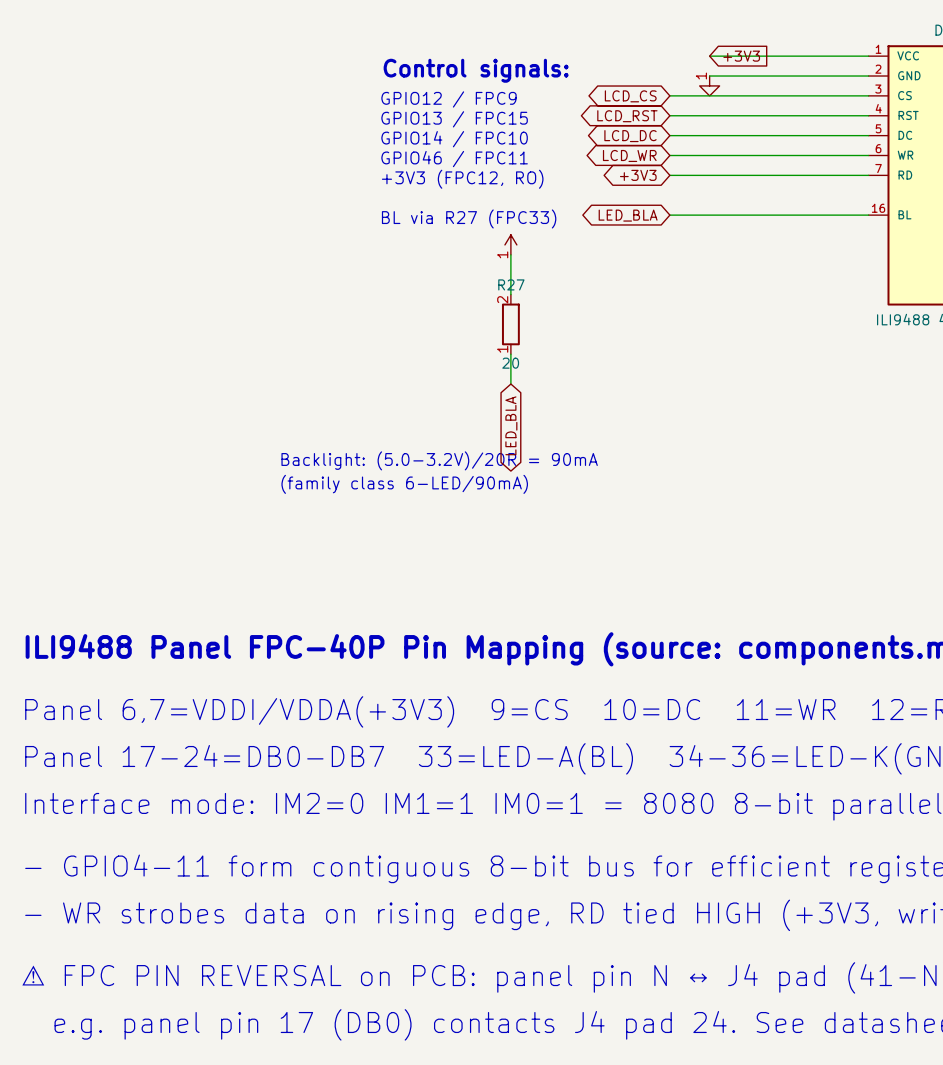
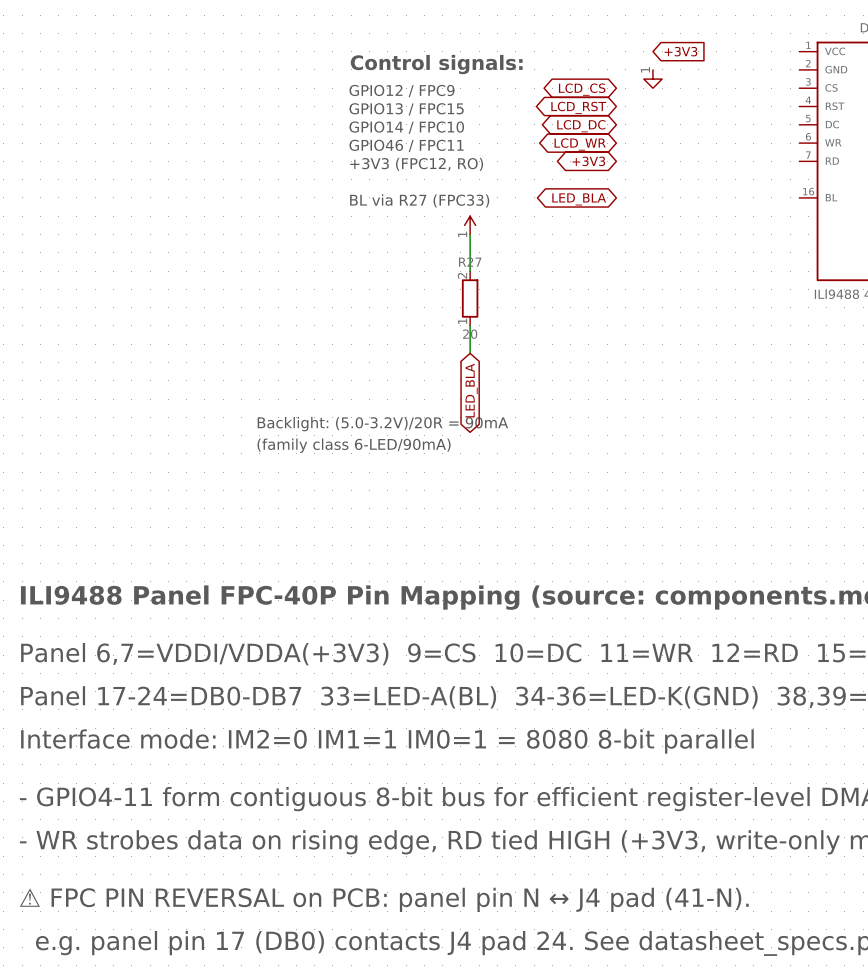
wire: (709, 56) (868, 56) -> none
wire: (709, 76) (868, 76) -> none
wire: (669, 95) (868, 95) -> none
wire: (669, 115) (868, 115) -> none
wire: (669, 135) (868, 135) -> none
wire: (669, 155) (868, 155) -> none
wire: (669, 175) (868, 175) -> none
wire: (669, 215) (868, 215) -> none

